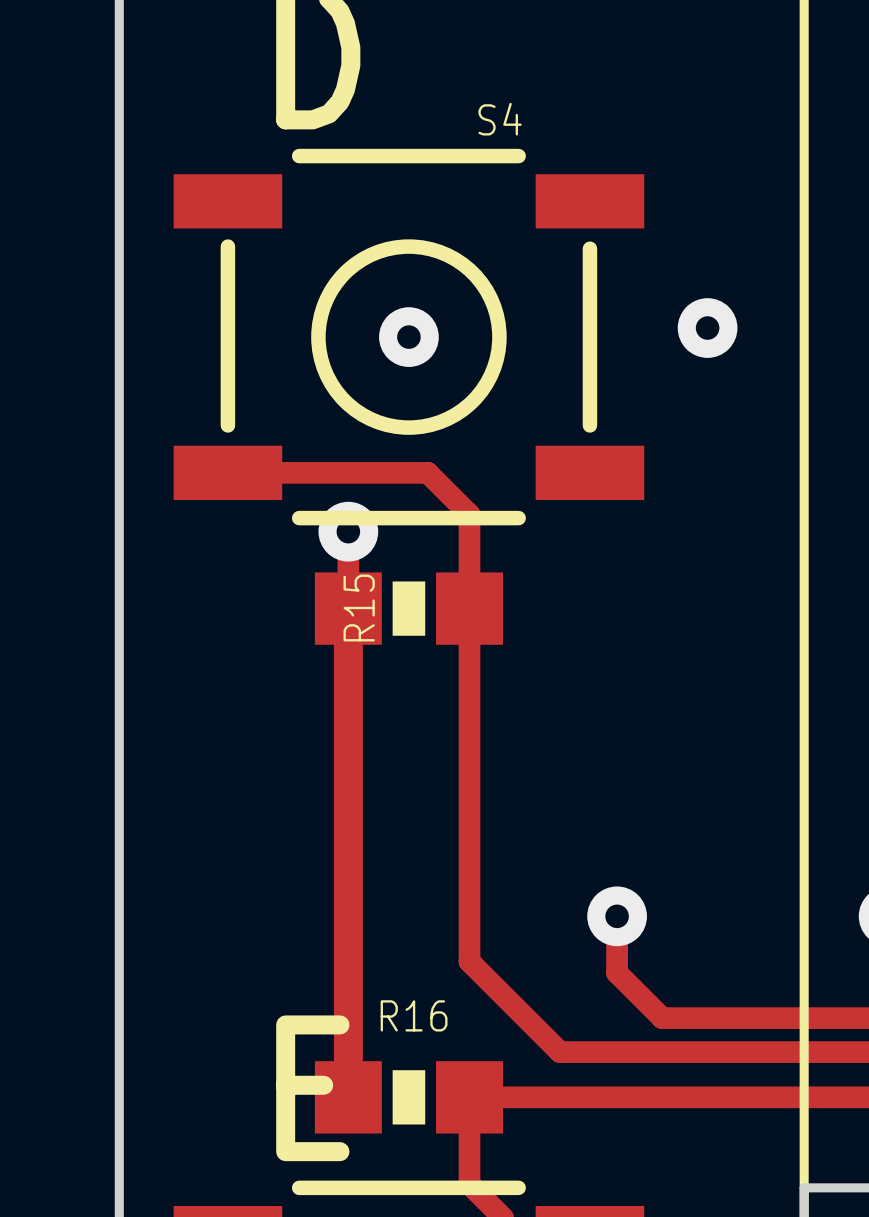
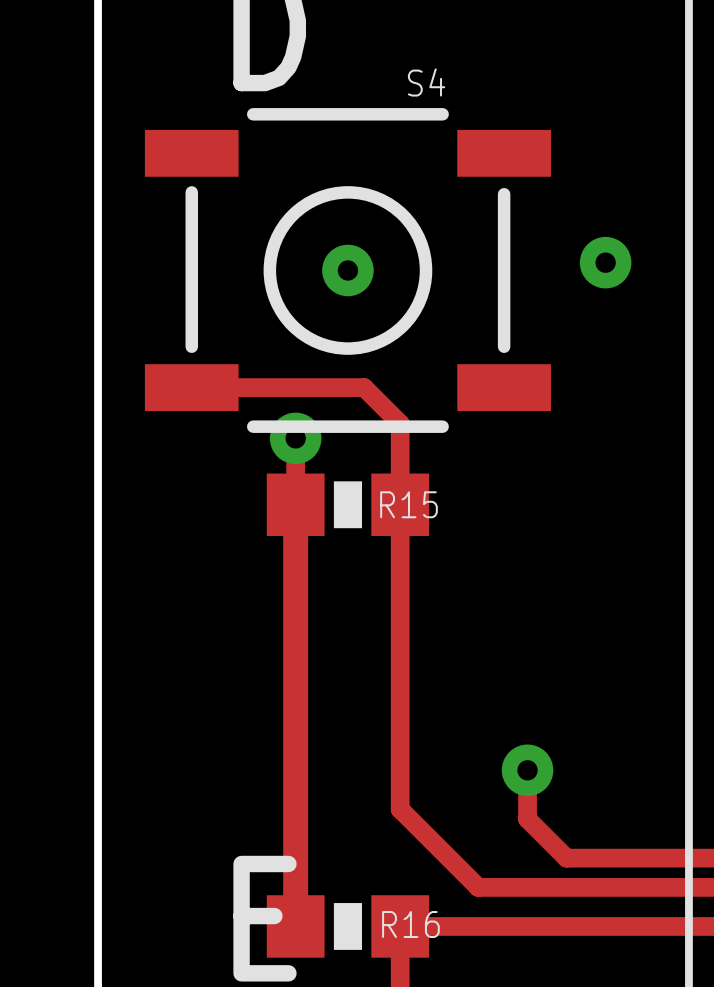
R15 name rotation: 0° (359, 607) -> 90° clockwise (408, 504)
R15 name position: R15 (359, 607) -> R15 (408, 504)
R16 name position: R16 (414, 1015) -> R16 (410, 924)

